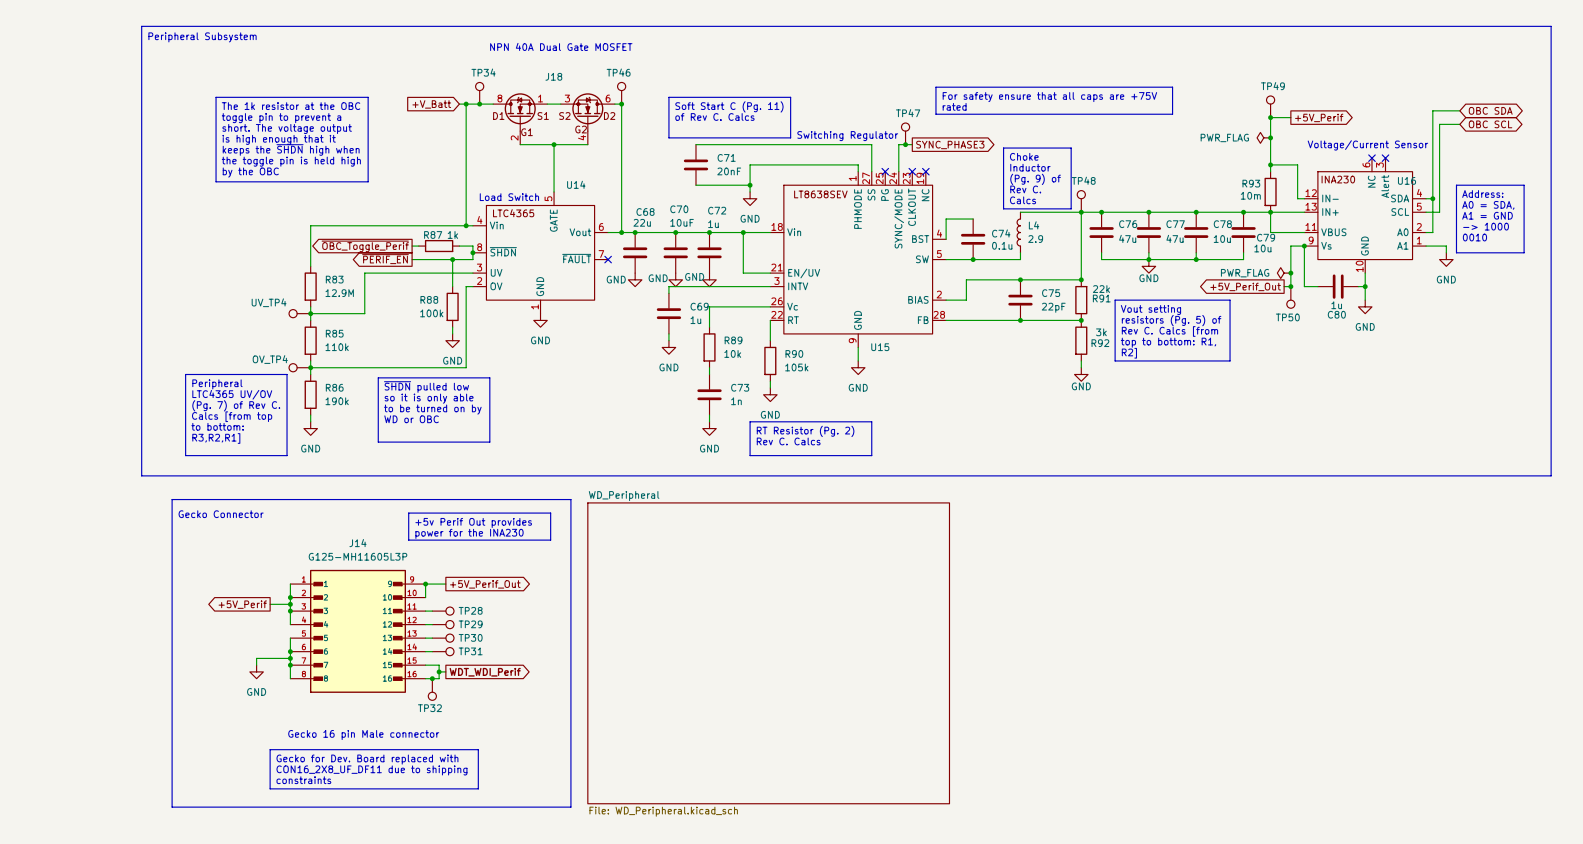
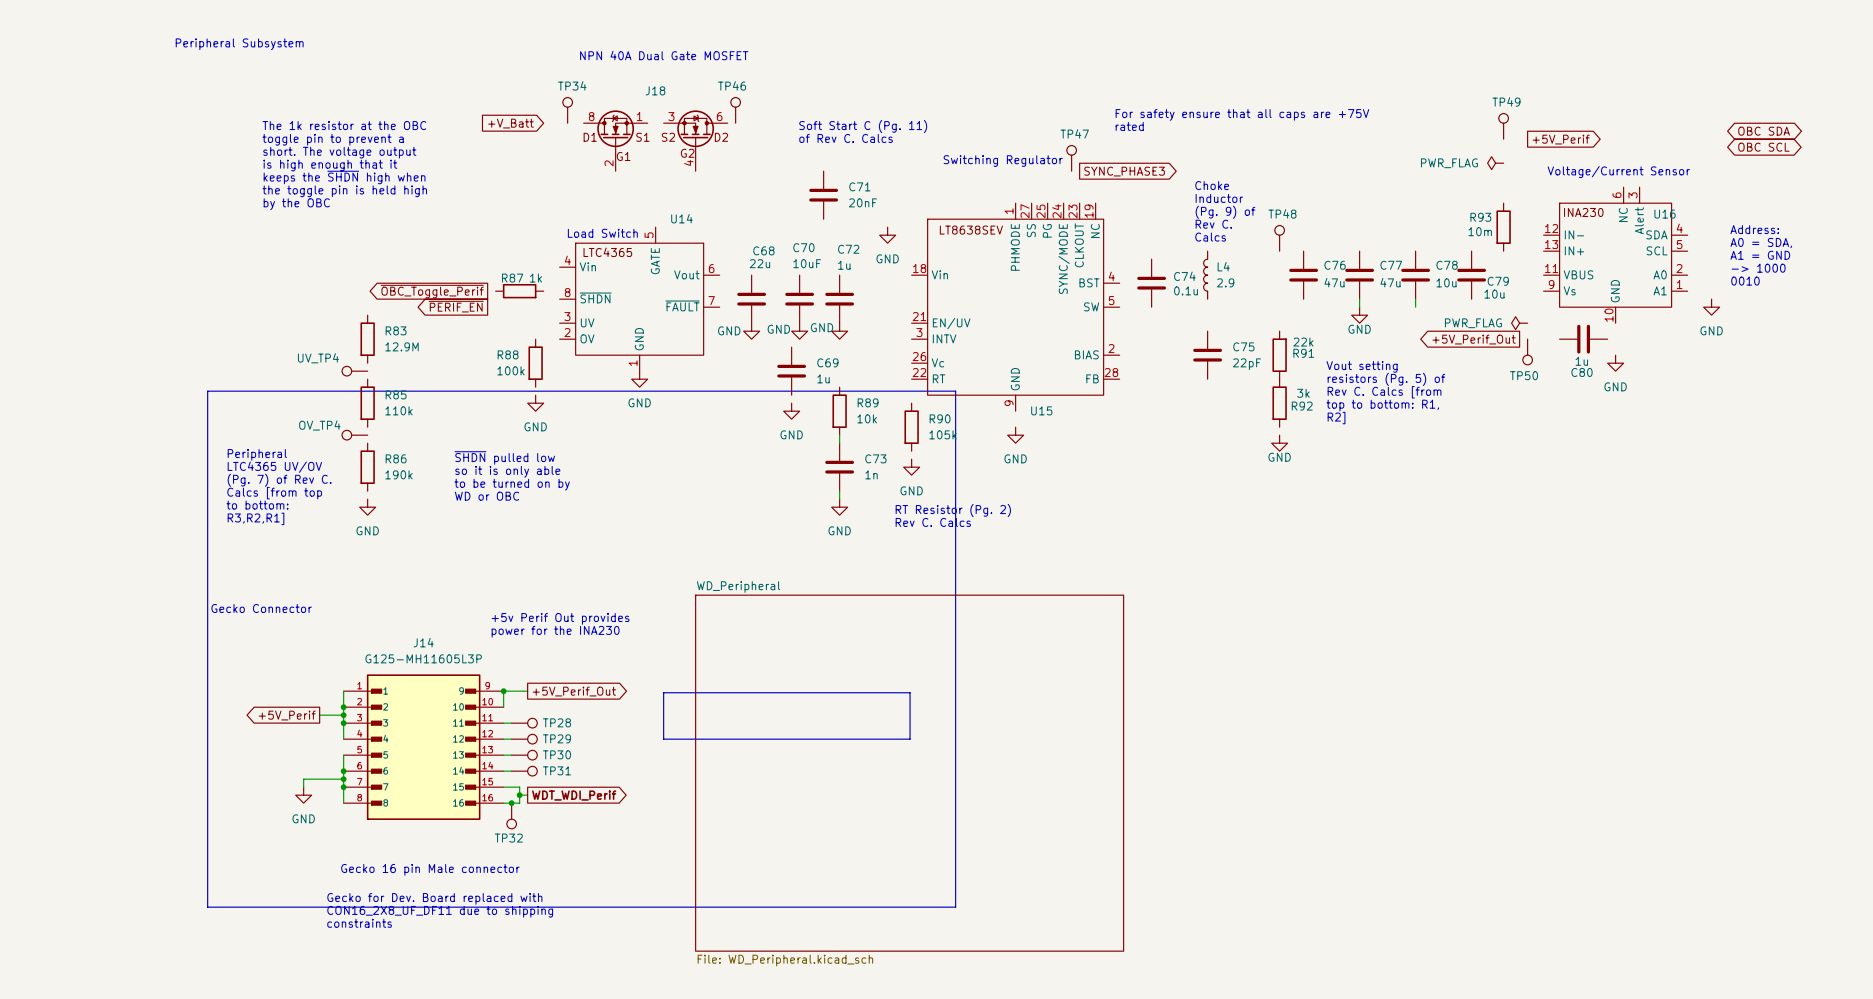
line: (141, 26) (1551, 26) (1551, 475) (141, 475) (141, 26) -> none
line: (935, 87) (1172, 87) (1172, 114) (935, 114) (935, 87) -> none
line: (216, 97) (368, 97) (368, 181) (216, 181) (216, 97) -> none
line: (668, 97) (790, 97) (790, 137) (668, 137) (668, 97) -> none
wire: (459, 104) (493, 104) -> none
wire: (466, 104) (466, 225) -> none
junction: (466, 104) -> none
junction: (479, 104) -> none
wire: (547, 104) (560, 104) -> none
wire: (614, 104) (621, 104) (621, 232) -> none
junction: (621, 104) -> none
wire: (1459, 110) (1432, 110) (1432, 232) (1426, 232) -> none
junction: (1270, 117) -> none
wire: (1290, 117) (1270, 117) (1270, 171) -> none
wire: (1459, 124) (1439, 124) (1439, 212) (1426, 212) -> none
junction: (1270, 137) -> none
wire: (520, 144) (587, 144) -> none
wire: (554, 144) (554, 191) -> none
junction: (554, 144) -> none
wire: (695, 144) (871, 144) (871, 171) -> none
junction: (905, 144) -> none
wire: (912, 144) (898, 144) (898, 171) -> none
line: (1003, 148) (1071, 148) (1071, 208) (1003, 208) (1003, 148) -> none
no-connect mark: (1371, 158) -> none
no-connect mark: (1385, 158) -> none
wire: (1270, 164) (1297, 164) (1297, 198) (1304, 198) -> none
junction: (1270, 164) -> none
wire: (858, 171) (858, 164) (750, 164) (750, 191) -> none
no-connect mark: (885, 171) -> none
no-connect mark: (912, 171) -> none
no-connect mark: (925, 171) -> none
wire: (695, 185) (750, 185) -> none
junction: (750, 185) -> none
line: (1456, 185) (1524, 185) (1524, 252) (1456, 252) (1456, 185) -> none
wire: (1426, 198) (1432, 198) -> none
junction: (1432, 198) -> none
wire: (1020, 212) (1304, 212) -> none
wire: (1081, 212) (1081, 279) (966, 279) (966, 300) (946, 300) -> none
junction: (1081, 212) -> none
junction: (1101, 212) -> none
junction: (1148, 212) -> none
junction: (1196, 212) -> none
junction: (1243, 212) -> none
wire: (1270, 212) (1270, 232) (1304, 232) -> none
junction: (1270, 212) -> none
wire: (973, 219) (946, 219) (946, 239) -> none
junction: (466, 225) -> none
wire: (472, 225) (310, 225) (310, 266) -> none
wire: (608, 232) (770, 232) -> none
junction: (621, 232) -> none
junction: (635, 232) -> none
junction: (675, 232) -> none
junction: (709, 232) -> none
wire: (743, 232) (743, 273) (770, 273) -> none
junction: (743, 232) -> none
wire: (412, 246) (418, 246) -> none
wire: (459, 246) (472, 246) (472, 259) (412, 259) -> none
junction: (1304, 246) -> none
wire: (1426, 246) (1446, 246) (1446, 252) -> none
junction: (472, 252) -> none
wire: (1020, 252) (1020, 259) (946, 259) -> none
wire: (1101, 252) (1101, 259) (1243, 259) (1243, 252) -> none
wire: (452, 259) (452, 286) -> none
junction: (452, 259) -> none
no-connect mark: (608, 259) -> none
junction: (973, 259) -> none
junction: (1148, 259) -> none
junction: (1196, 259) -> none
wire: (472, 273) (364, 273) (364, 313) (310, 313) -> none
junction: (1290, 273) -> none
wire: (1365, 273) (1365, 300) -> none
junction: (1020, 279) -> none
junction: (1081, 279) -> none
wire: (472, 286) (466, 286) (466, 367) (310, 367) -> none
wire: (770, 286) (668, 286) (668, 293) -> none
wire: (1284, 286) (1290, 286) (1290, 246) (1304, 246) (1304, 286) (1317, 286) -> none
junction: (1290, 286) -> none
wire: (1358, 286) (1365, 286) -> none
junction: (1365, 286) -> none
line: (1115, 300) (1230, 300) (1230, 360) (1115, 360) (1115, 300) -> none
wire: (310, 306) (310, 320) -> none
wire: (770, 306) (709, 306) (709, 327) -> none
junction: (310, 313) -> none
wire: (770, 320) (770, 340) -> none
wire: (946, 320) (1081, 320) -> none
junction: (1020, 320) -> none
junction: (1081, 320) -> none
wire: (452, 327) (452, 333) -> none
line: none -> (207, 391) (955, 391) (955, 907) (207, 907) (207, 391)
wire: (668, 333) (668, 340) -> none
wire: (858, 347) (858, 360) -> none
wire: (310, 360) (310, 374) -> none
wire: (1081, 360) (1081, 367) -> none
junction: (310, 367) -> none
line: (185, 374) (287, 374) (287, 455) (185, 455) (185, 374) -> none
line: (378, 377) (489, 377) (489, 442) (378, 442) (378, 377) -> none
wire: (770, 381) (770, 388) -> none
wire: (310, 415) (310, 421) -> none
line: (750, 421) (871, 421) (871, 455) (750, 455) (750, 421) -> none
line: (172, 499) (570, 499) (570, 807) (172, 807) (172, 499) -> none
line: (408, 513) (550, 513) (550, 540) (408, 540) (408, 513) -> none
line: none -> (663, 692) (910, 692) (910, 739) (663, 739) (663, 692)
line: (270, 749) (478, 749) (478, 788) (270, 788) (270, 749) -> none

